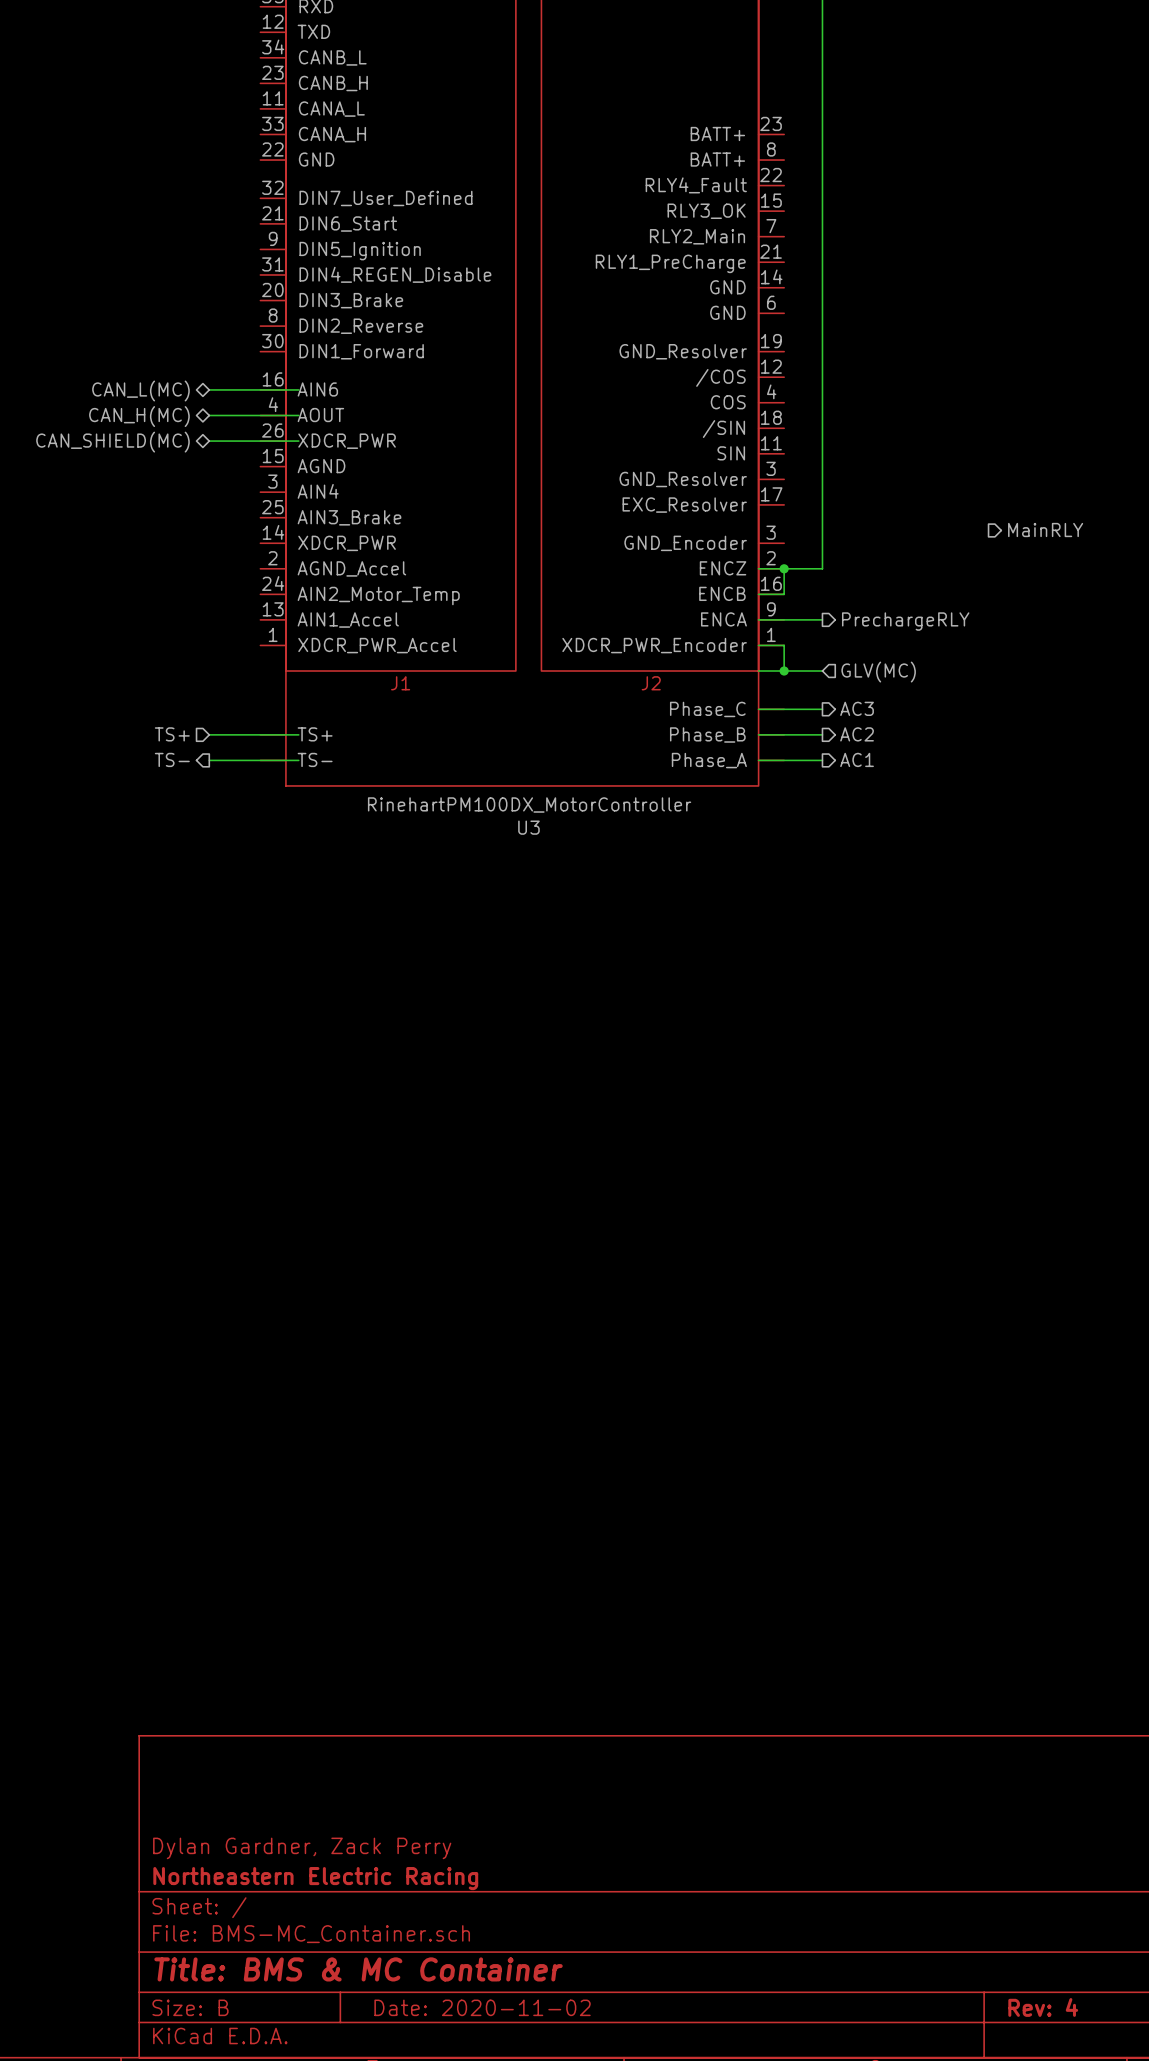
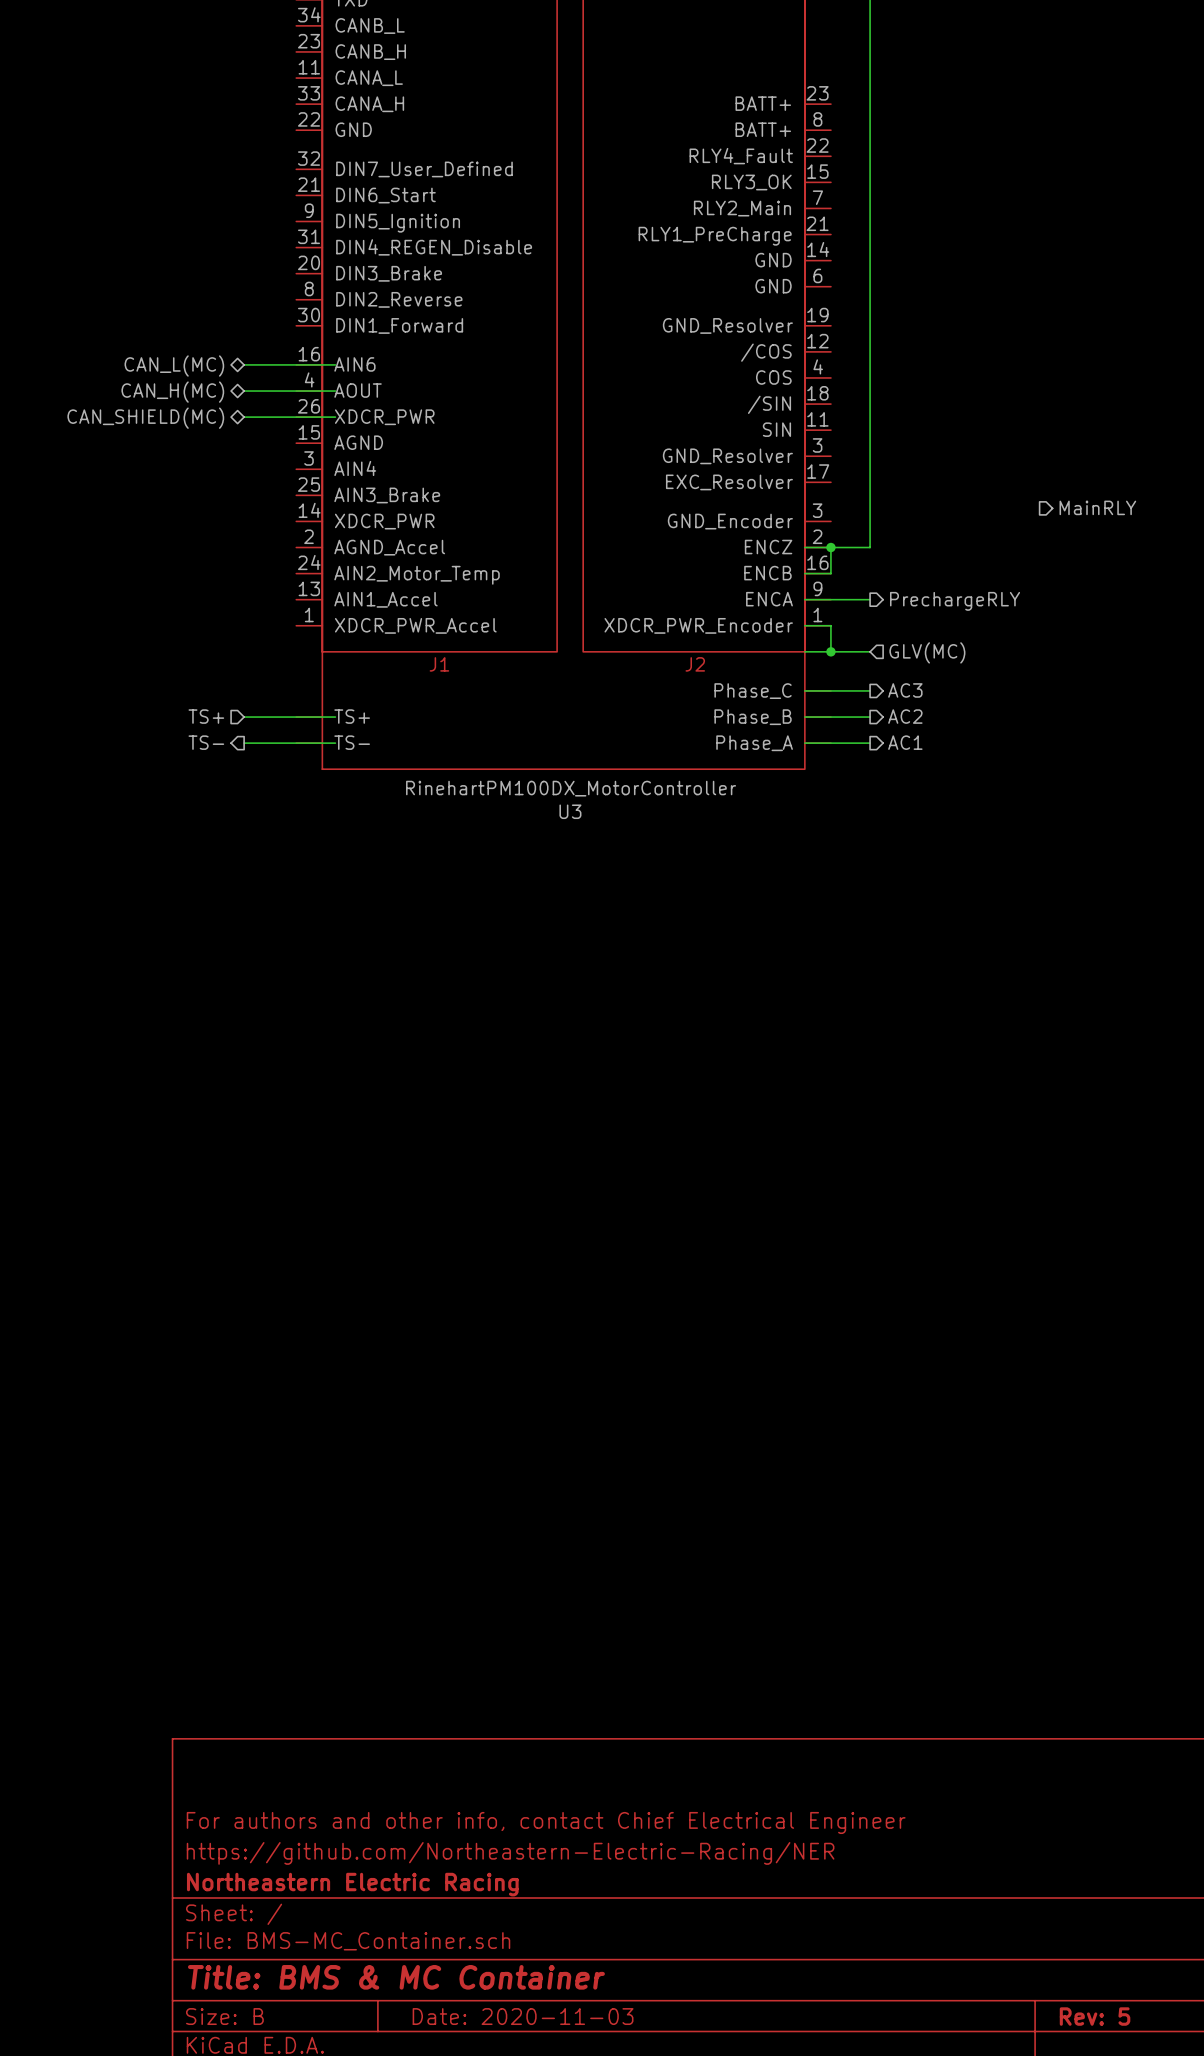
title block: none -> For authors and other info, contact Chief Electrical Engineer (546, 1822)
title block: Dylan Gardner, Zack Perry (302, 1848) -> https://github.com/Northeastern-Electric-Racing/NER (510, 1853)
title block: Date: 2020-11-02 (482, 2007) -> Date: 2020-11-03 (523, 2016)
title block: Rev: 4 (1043, 2007) -> Rev: 5 (1095, 2016)

